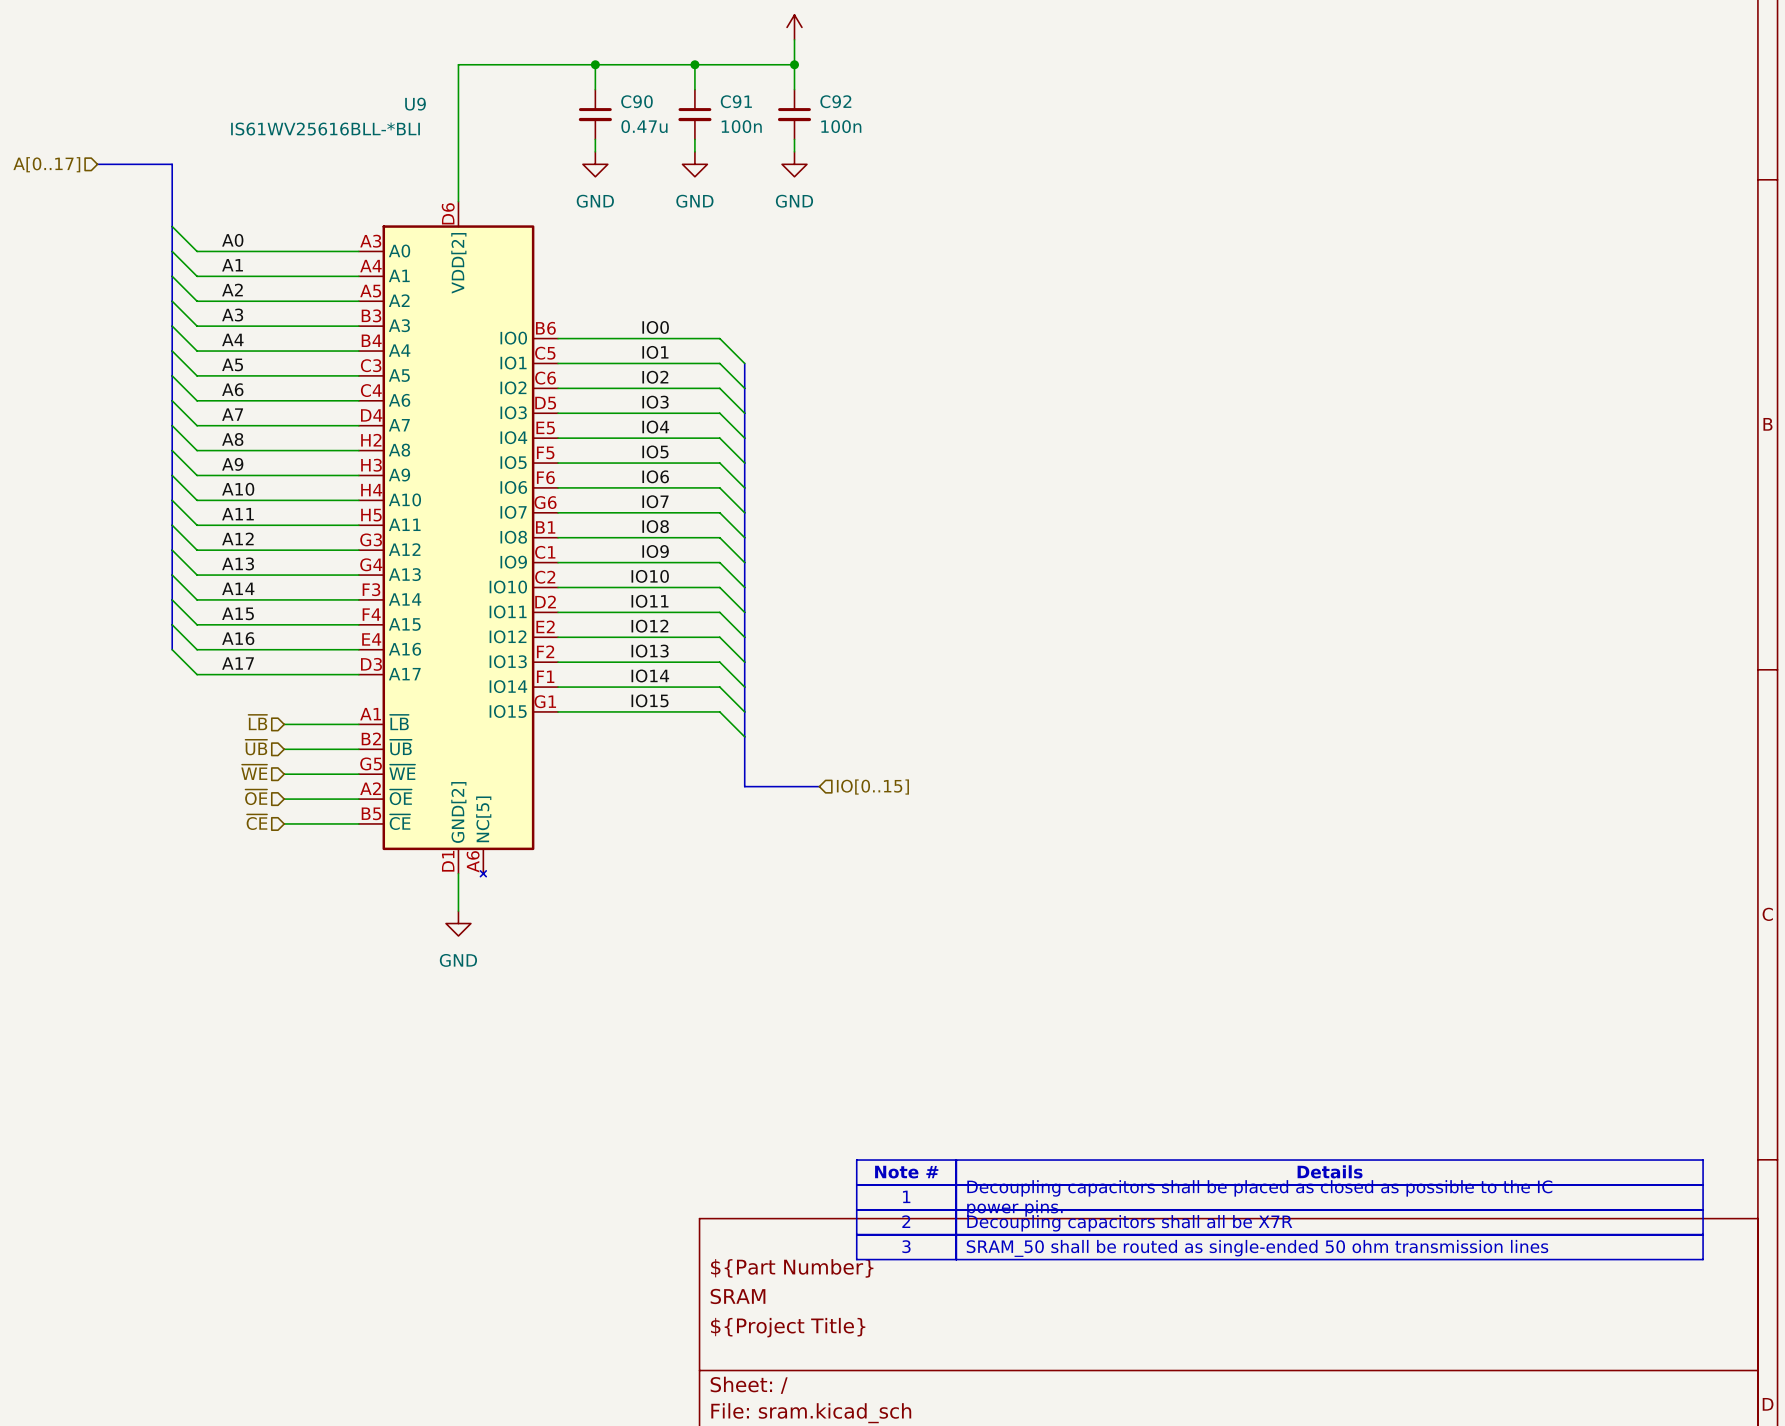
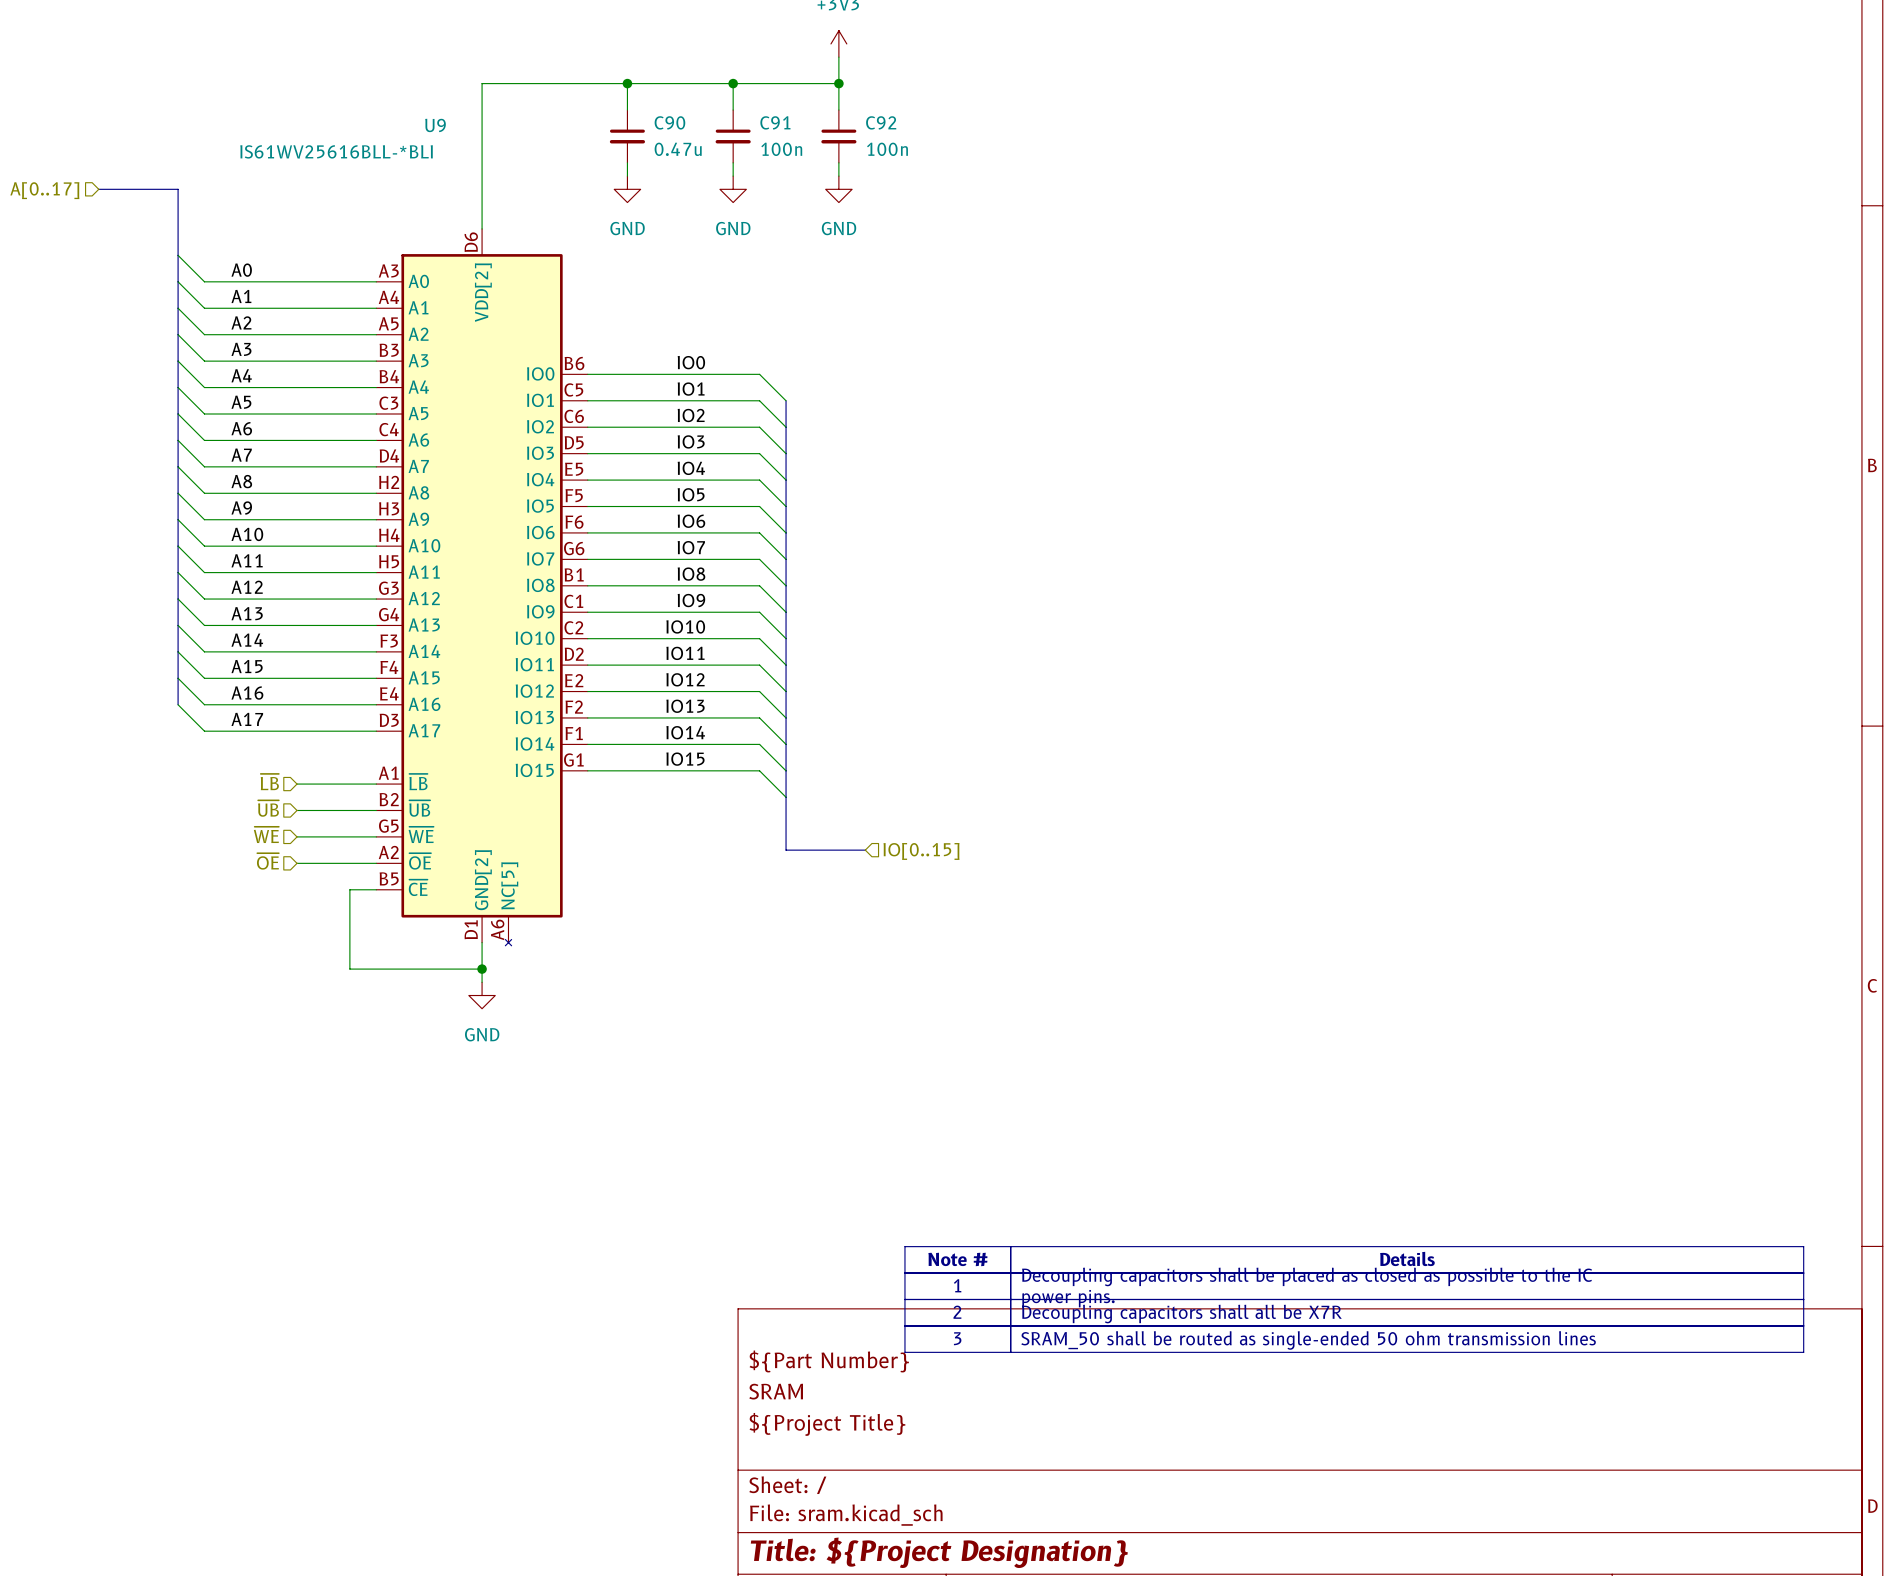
hierarchical label: ~{CE} (256, 822) -> none
wire: (284, 823) (333, 823) -> (482, 969) (349, 969) (349, 889)
junction: none -> (482, 969)

